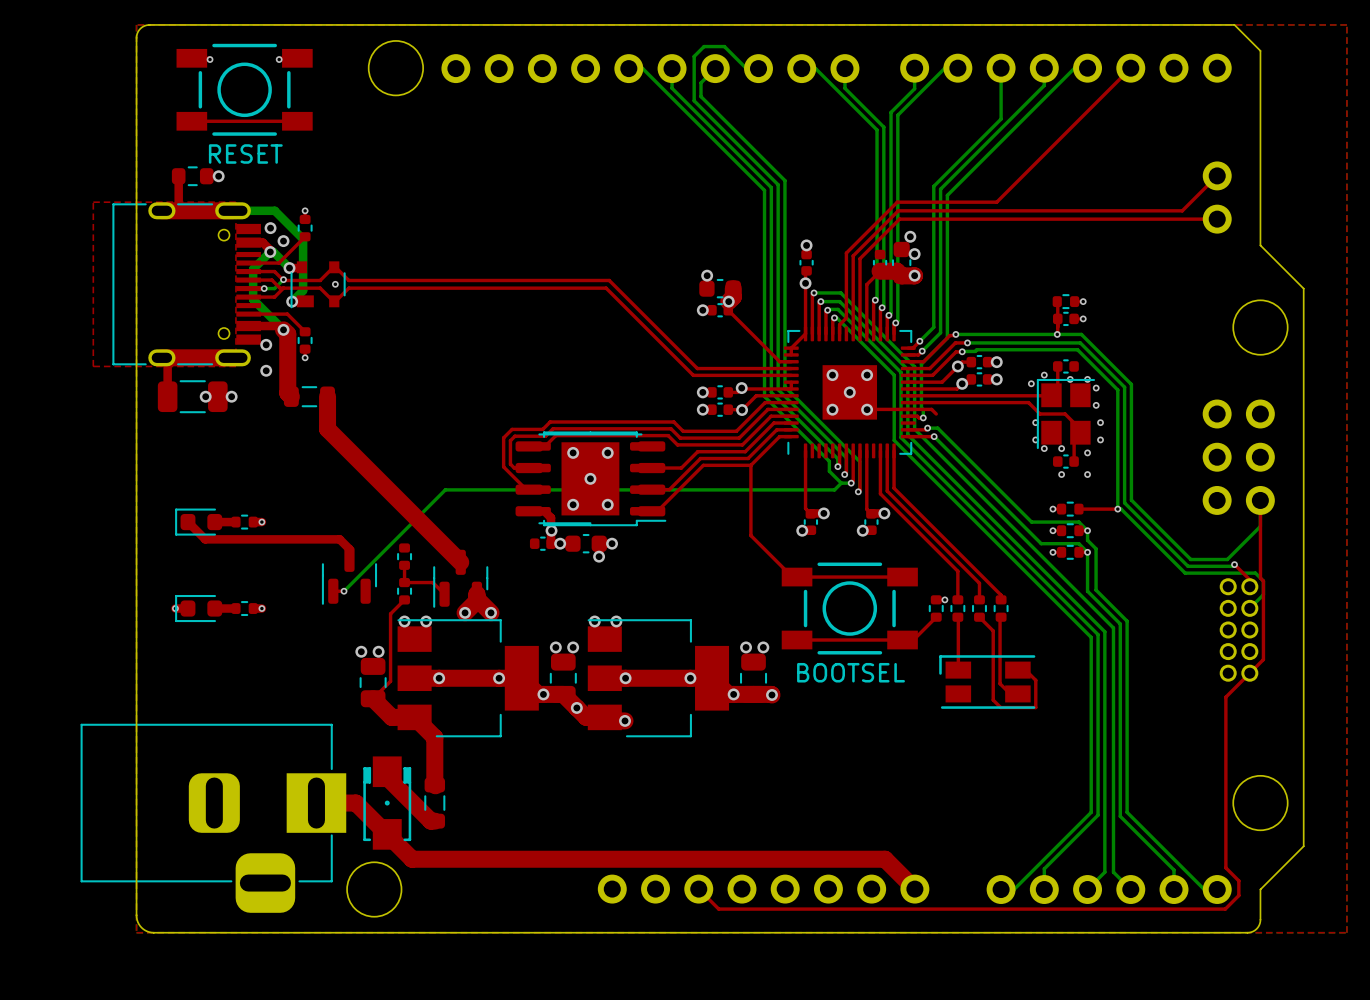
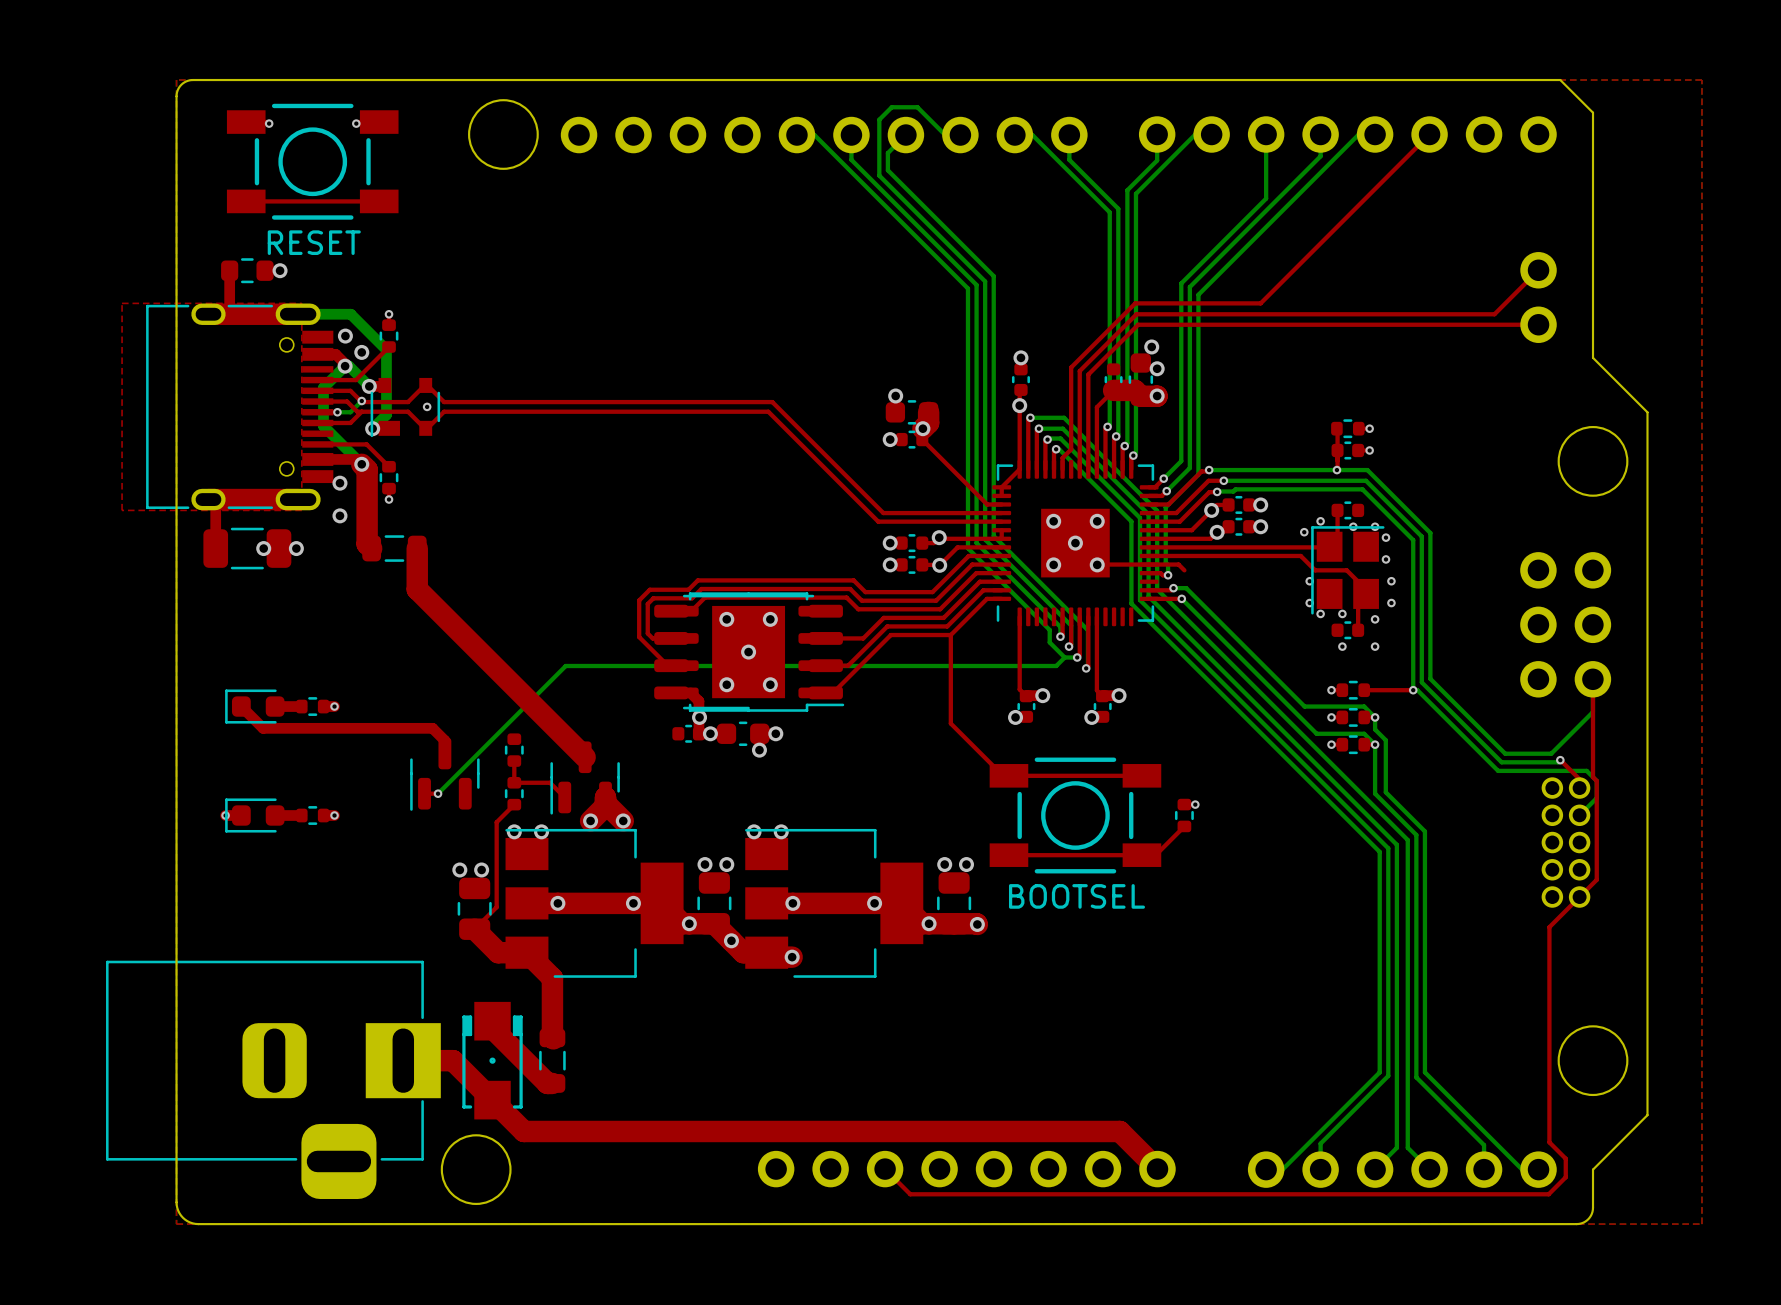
top track: (880, 450) (880, 493) (957, 571) (957, 599) -> none
top track: (887, 450) (887, 491) (979, 583) (979, 599) -> none
top track: (894, 450) (894, 488) (1001, 595) (1001, 599) -> none
part: (957, 608) -> none
part: (979, 608) -> none
part: (1001, 608) -> none
top track: (957, 617) (958, 670) -> none
top track: (979, 617) (993, 630) (993, 700) (1000, 707) (1035, 707) (1035, 680) (1025, 670) (1017, 670) -> none
top track: (1001, 617) (1000, 683) (1010, 693) (1017, 693) -> none
part: (987, 682) -> none

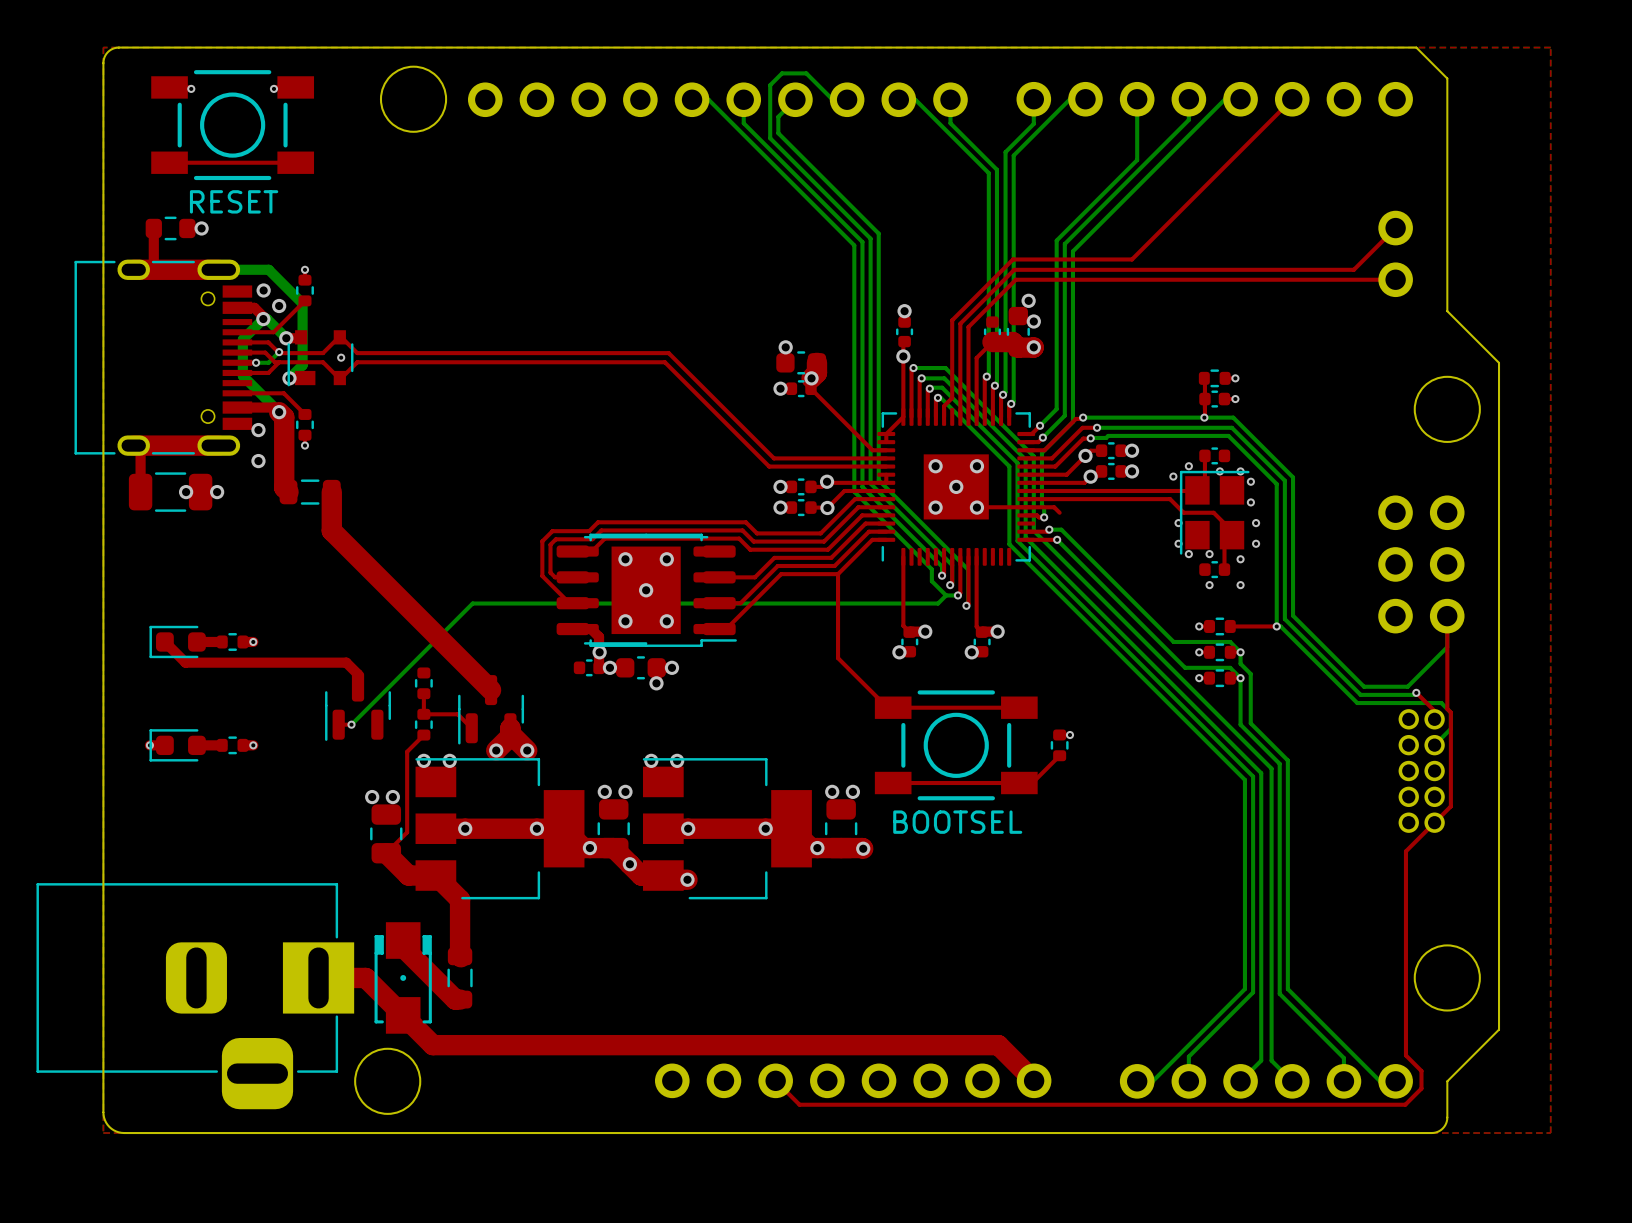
top zone outline: (122, 303) (301, 303) (301, 510) (122, 510) (122, 303) -> none

